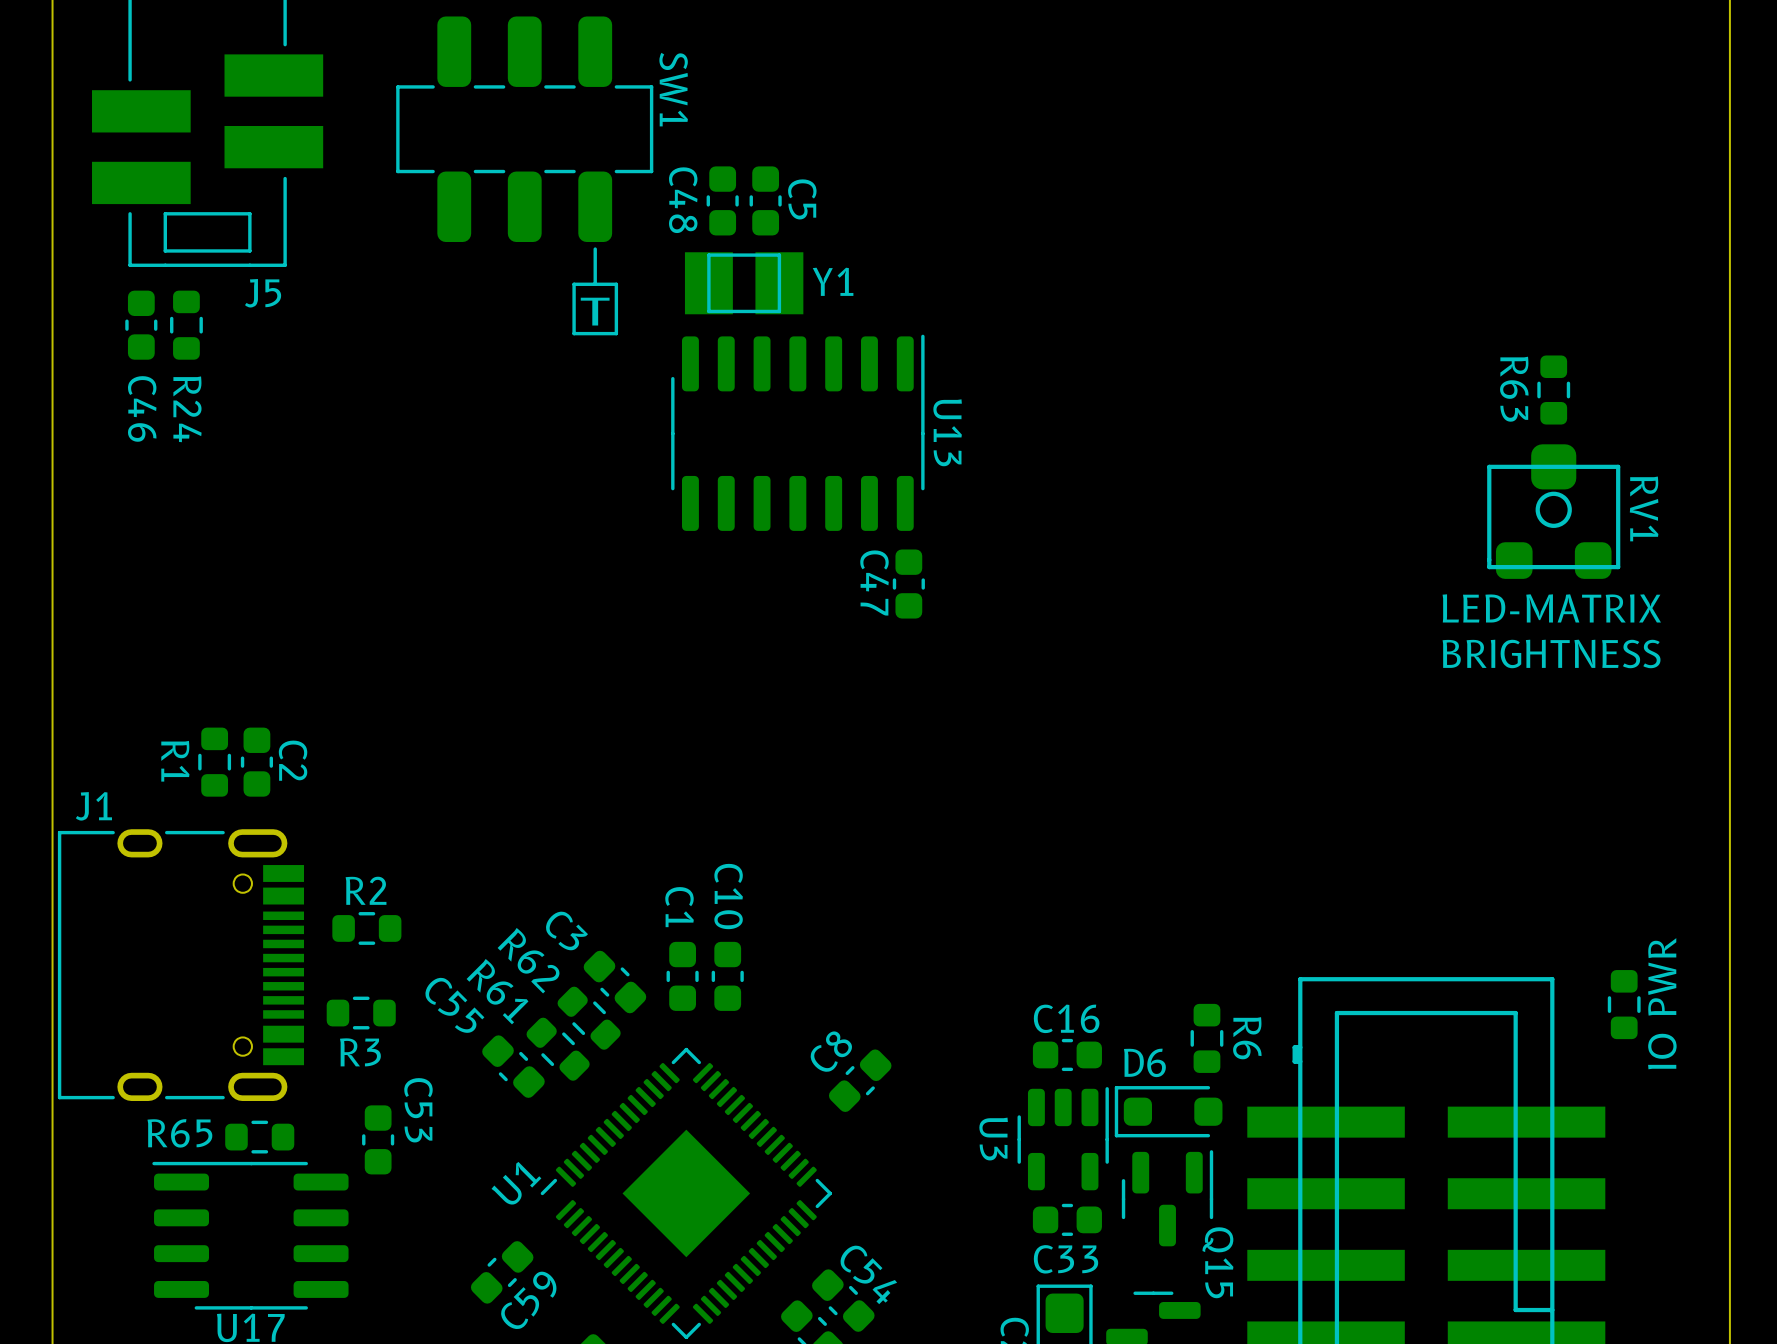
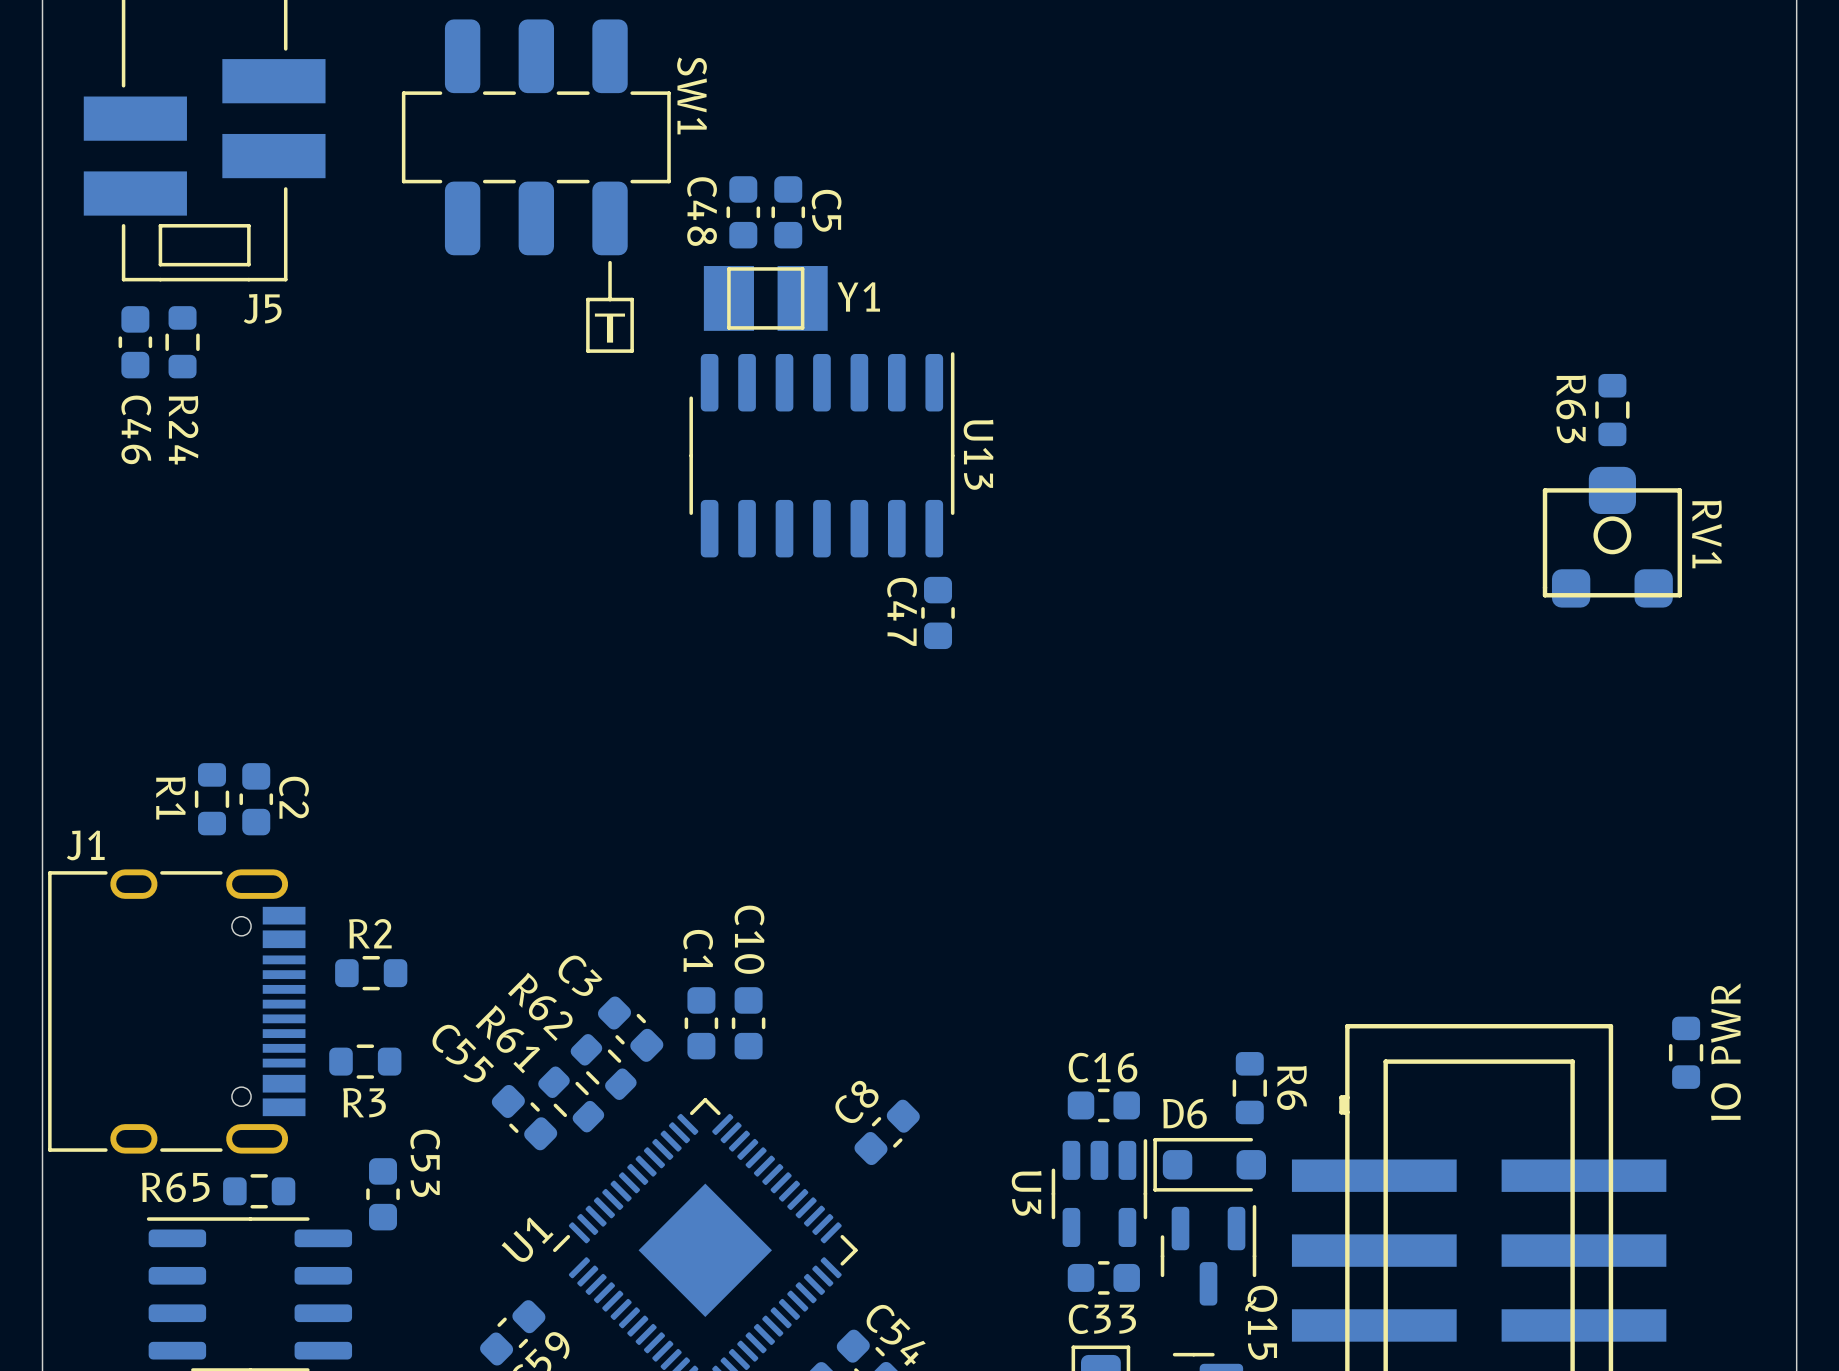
text: LED-MATRIX (1551, 608) -> none
text: BRIGHTNESS (1551, 653) -> none

